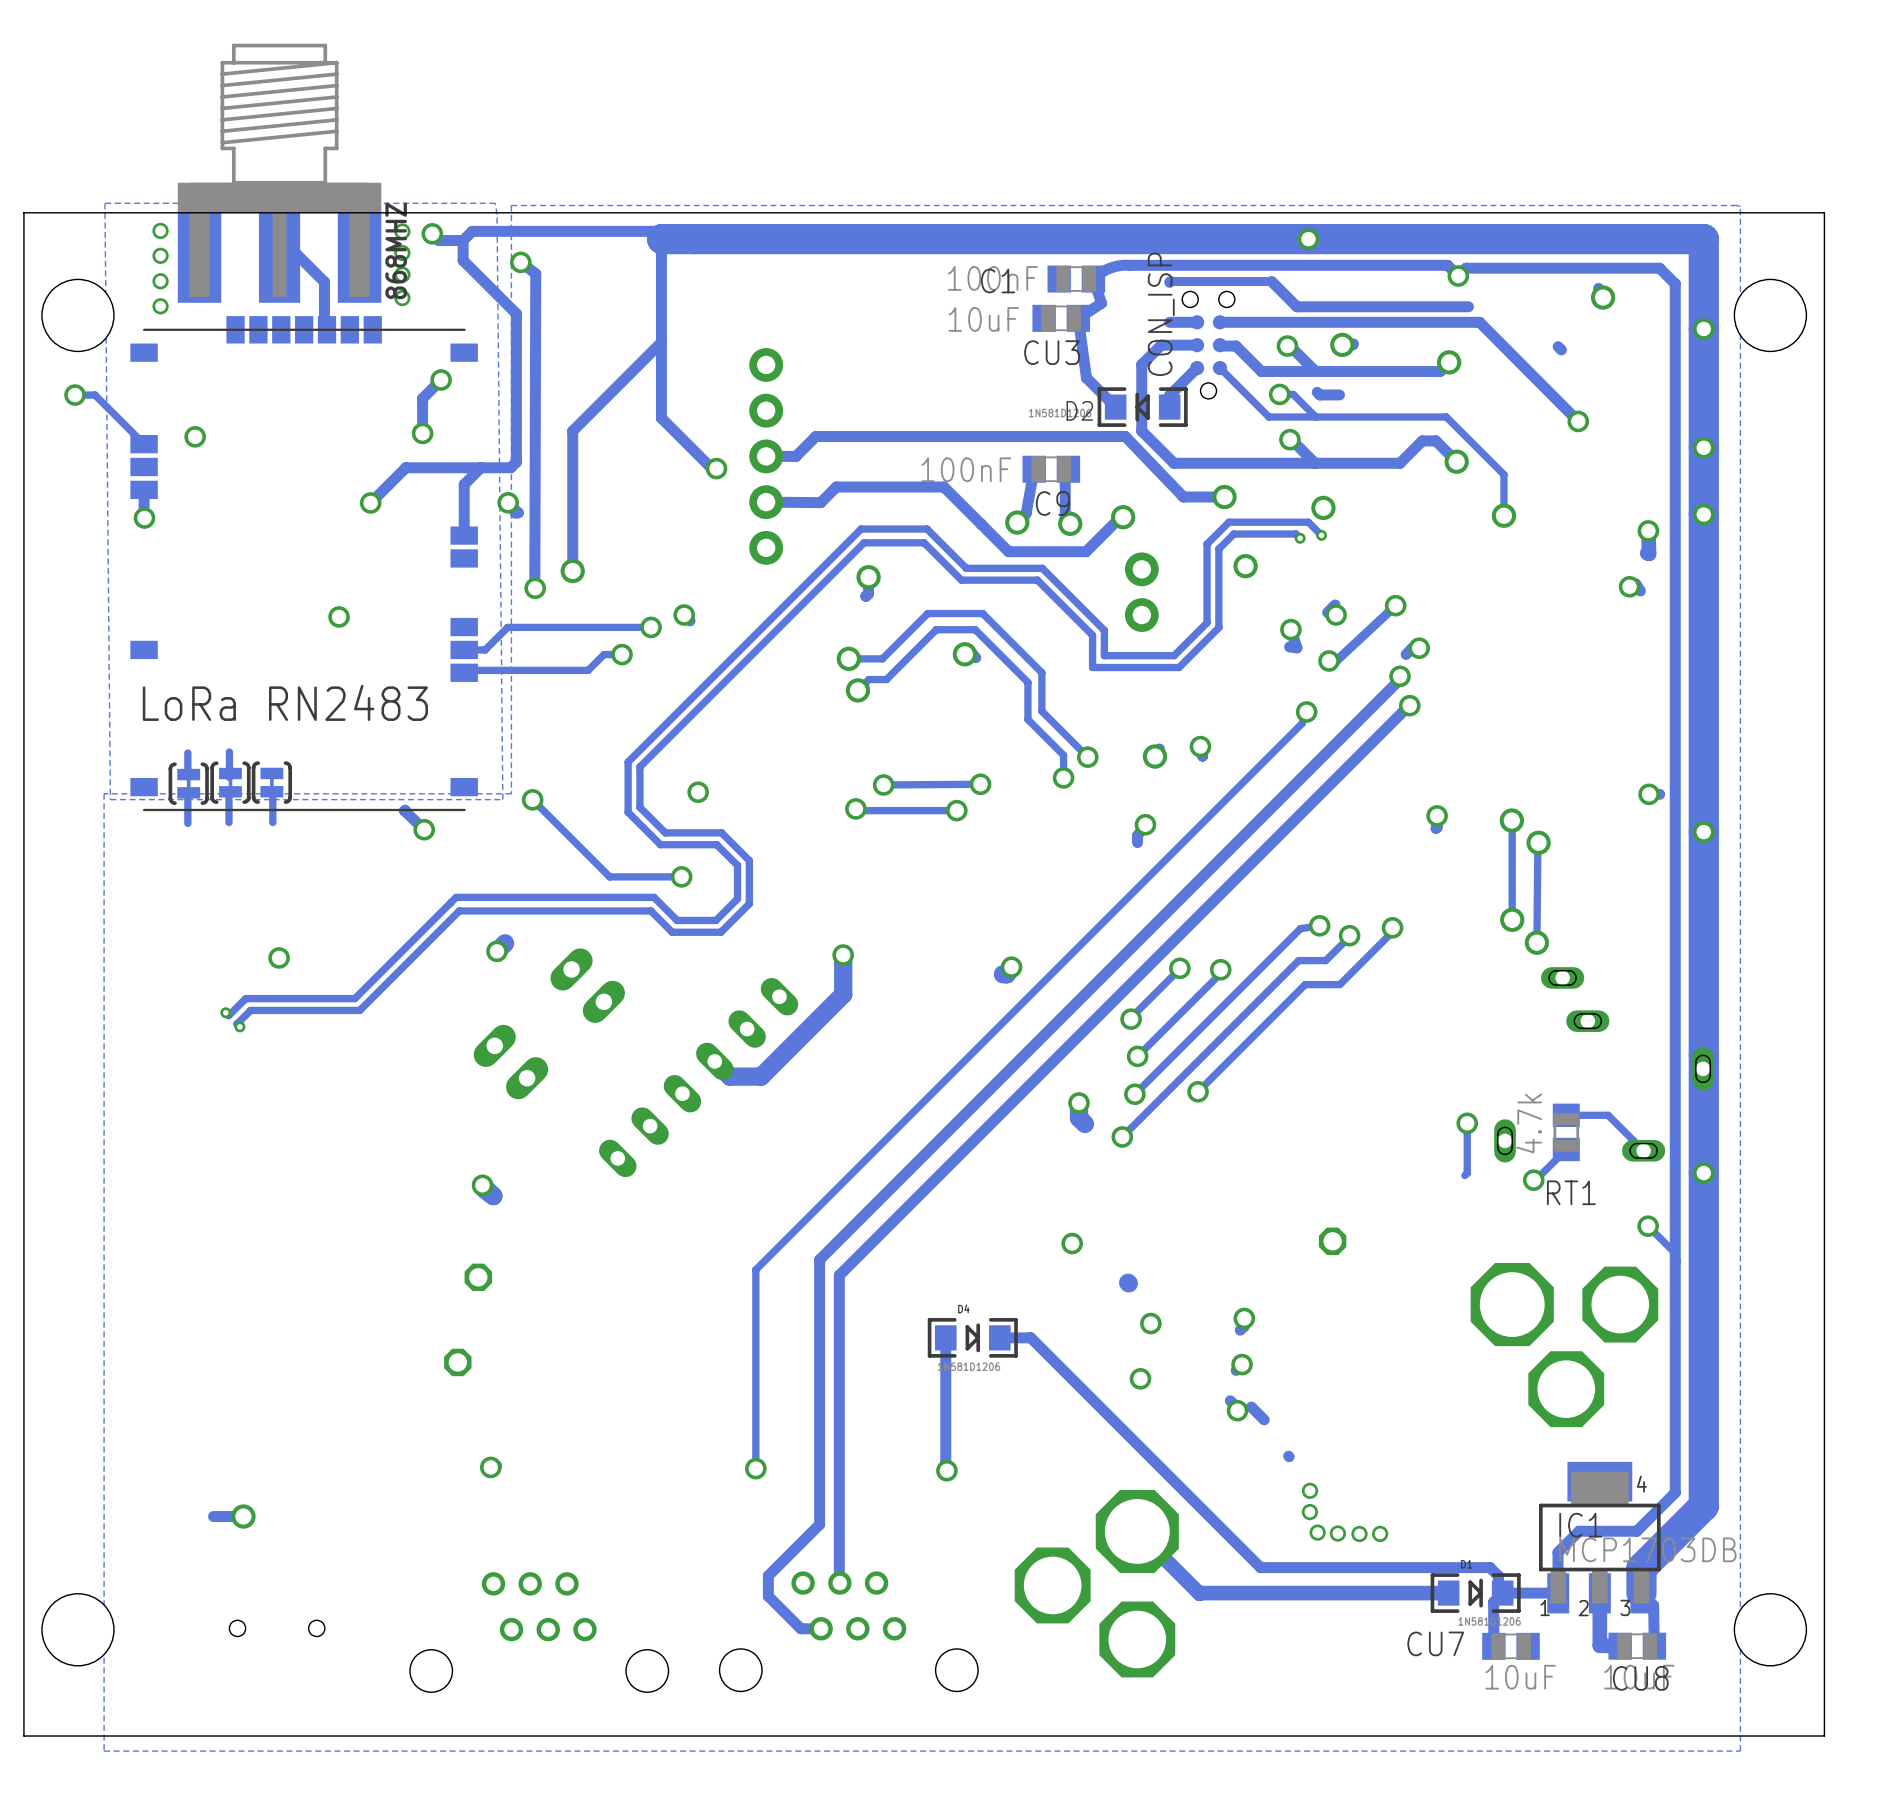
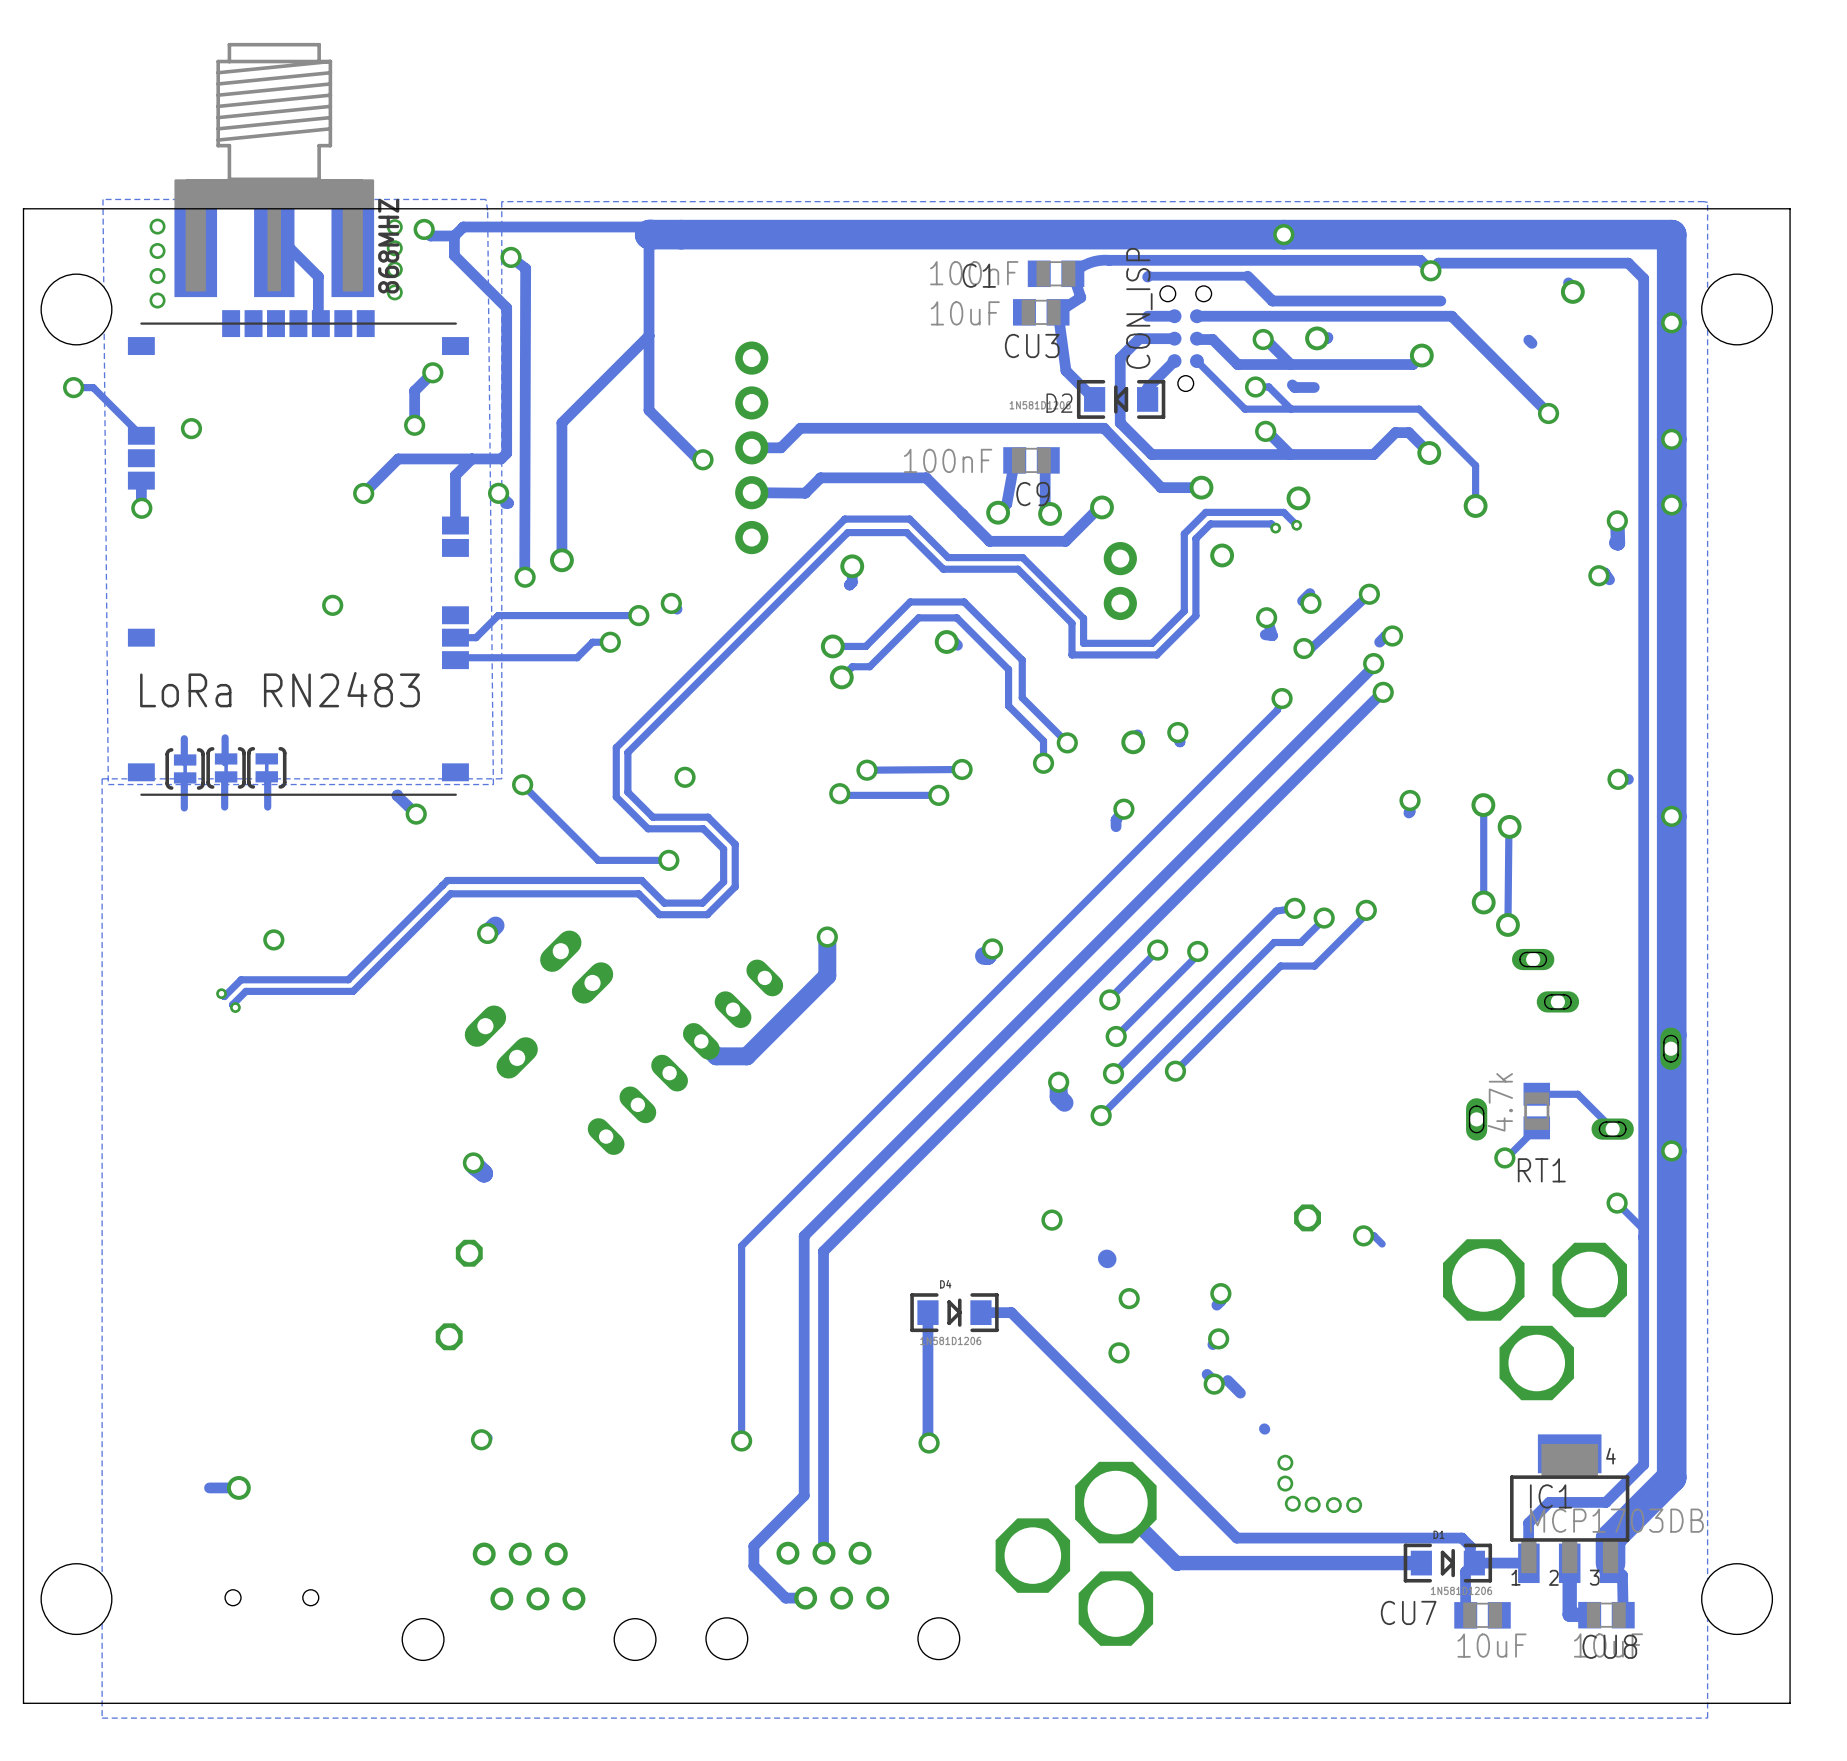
track: (1467, 1123) (1467, 1173) (1464, 1175) -> none
via: (1467, 1123) -> none
track: none -> (1363, 1235) (1373, 1235) (1382, 1244)
via: none -> (1363, 1235)

